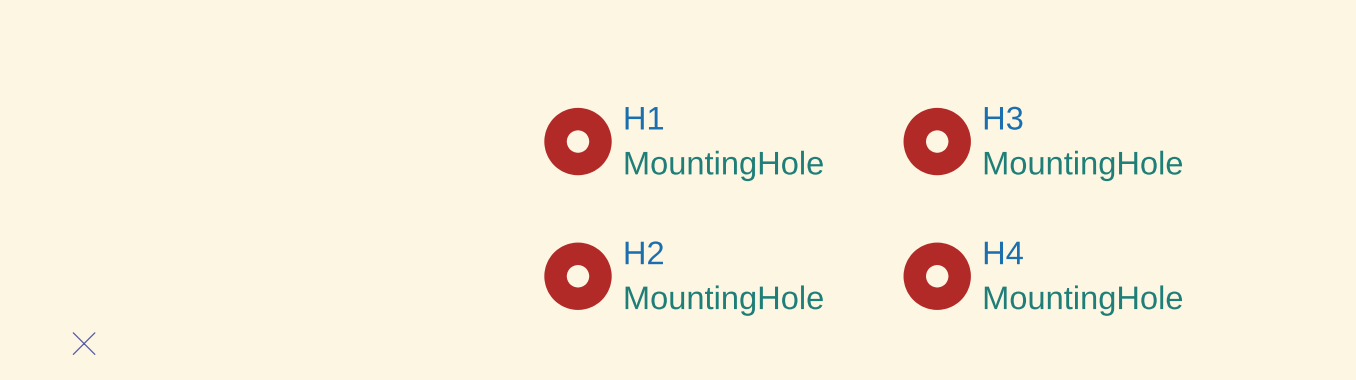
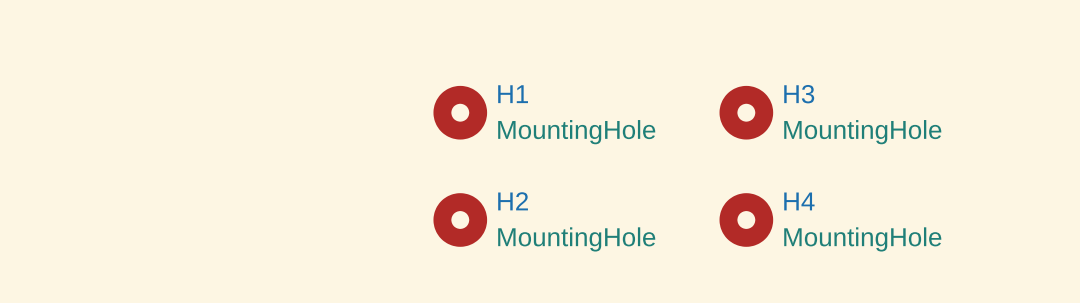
no-connect mark: (84, 343) -> none

